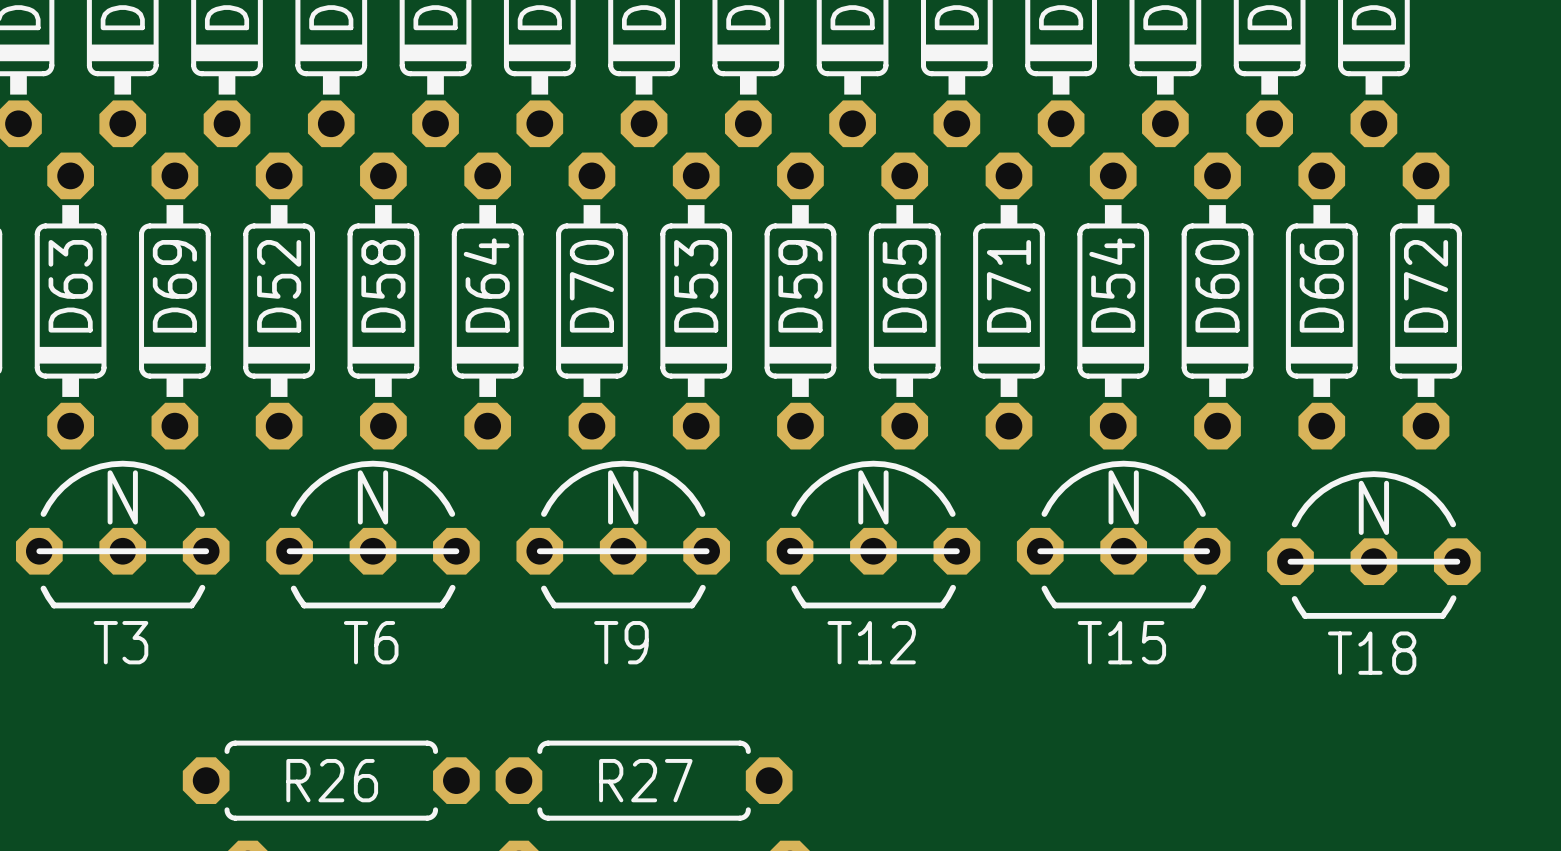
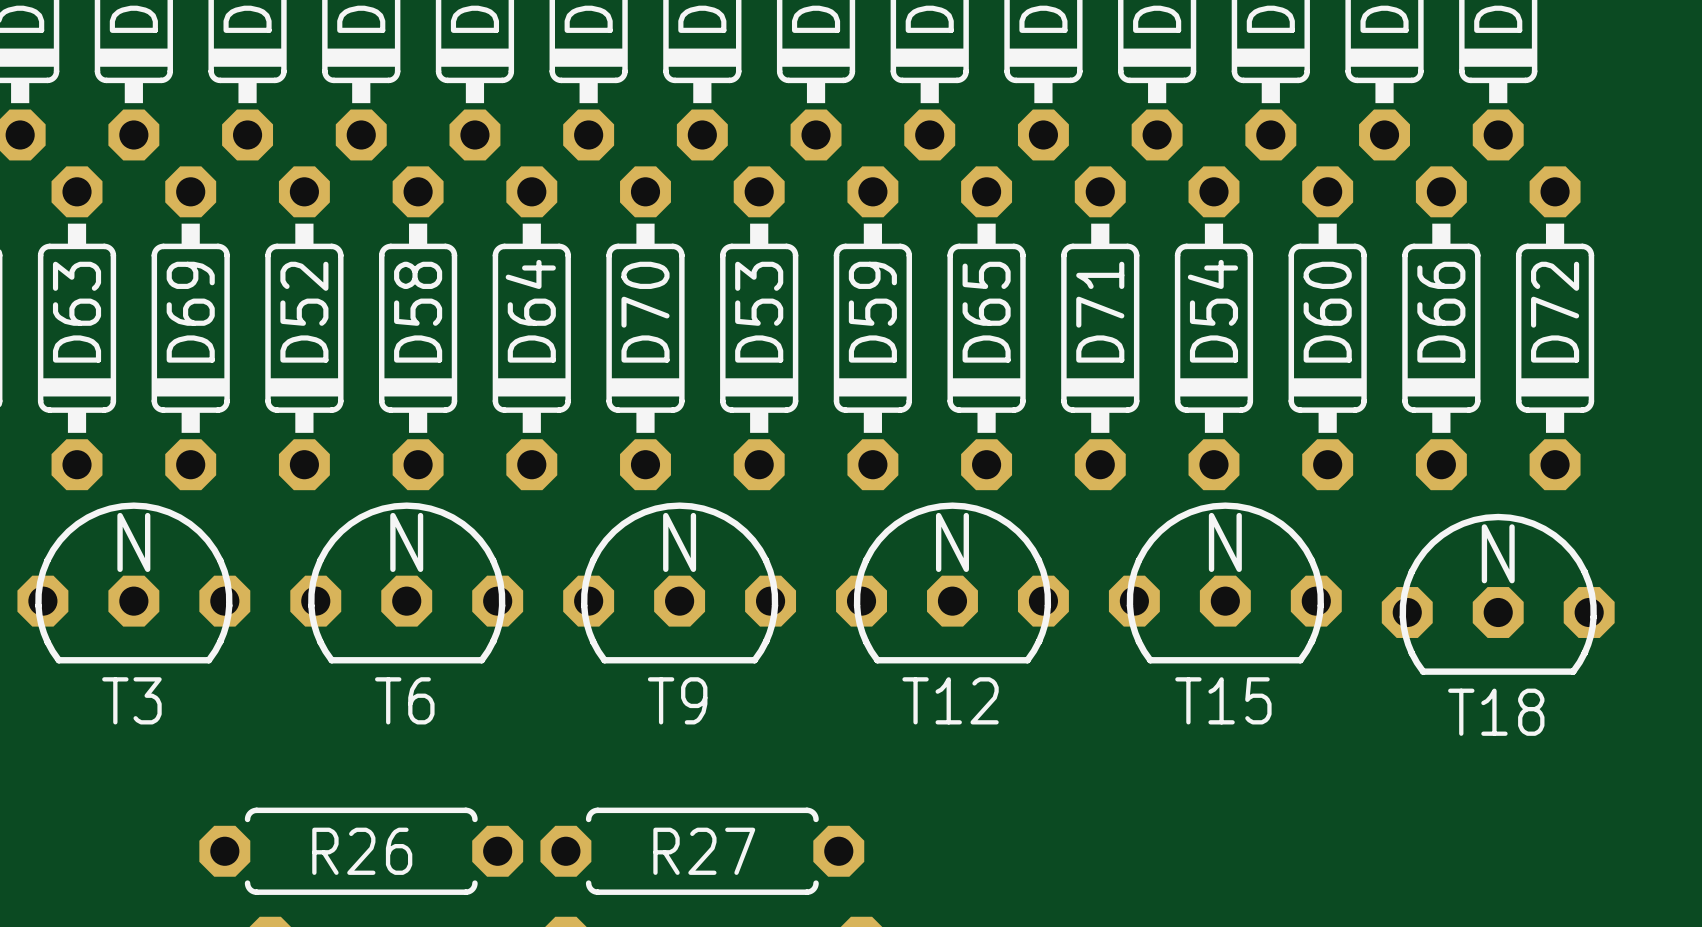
T3 footprint: [15, 460, 230, 609] -> [17, 502, 251, 664]
T6 footprint: [266, 460, 480, 609] -> [290, 502, 524, 664]
T9 footprint: [516, 460, 730, 609] -> [563, 502, 797, 664]
T12 footprint: [766, 460, 981, 609] -> [836, 502, 1069, 664]
T15 footprint: [1016, 460, 1231, 609] -> [1108, 502, 1342, 664]
T18 footprint: [1267, 471, 1481, 619] -> [1381, 513, 1615, 675]

